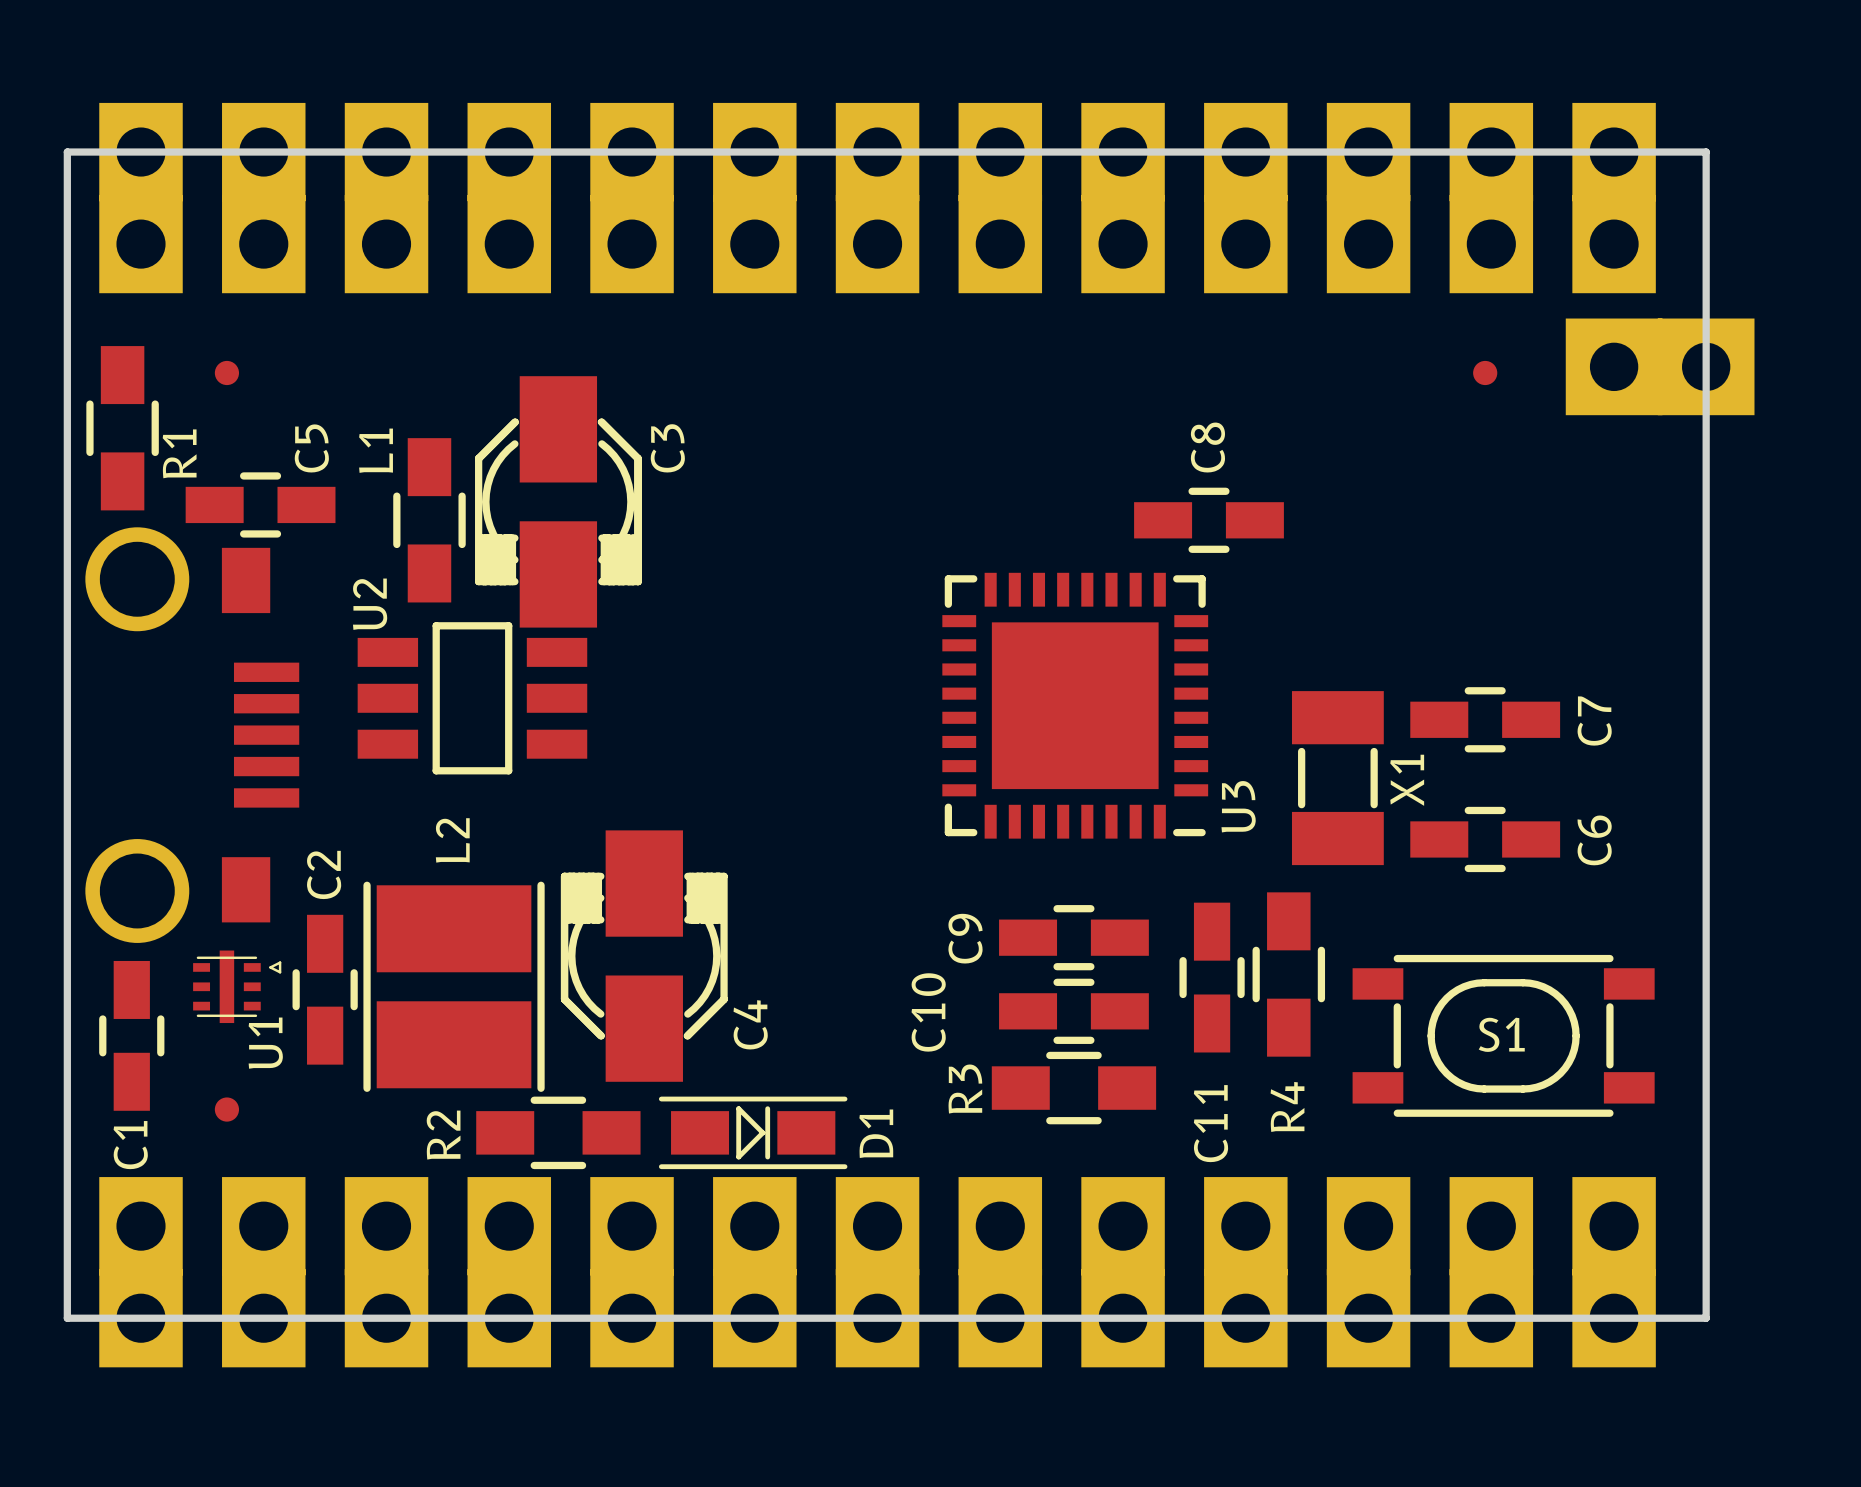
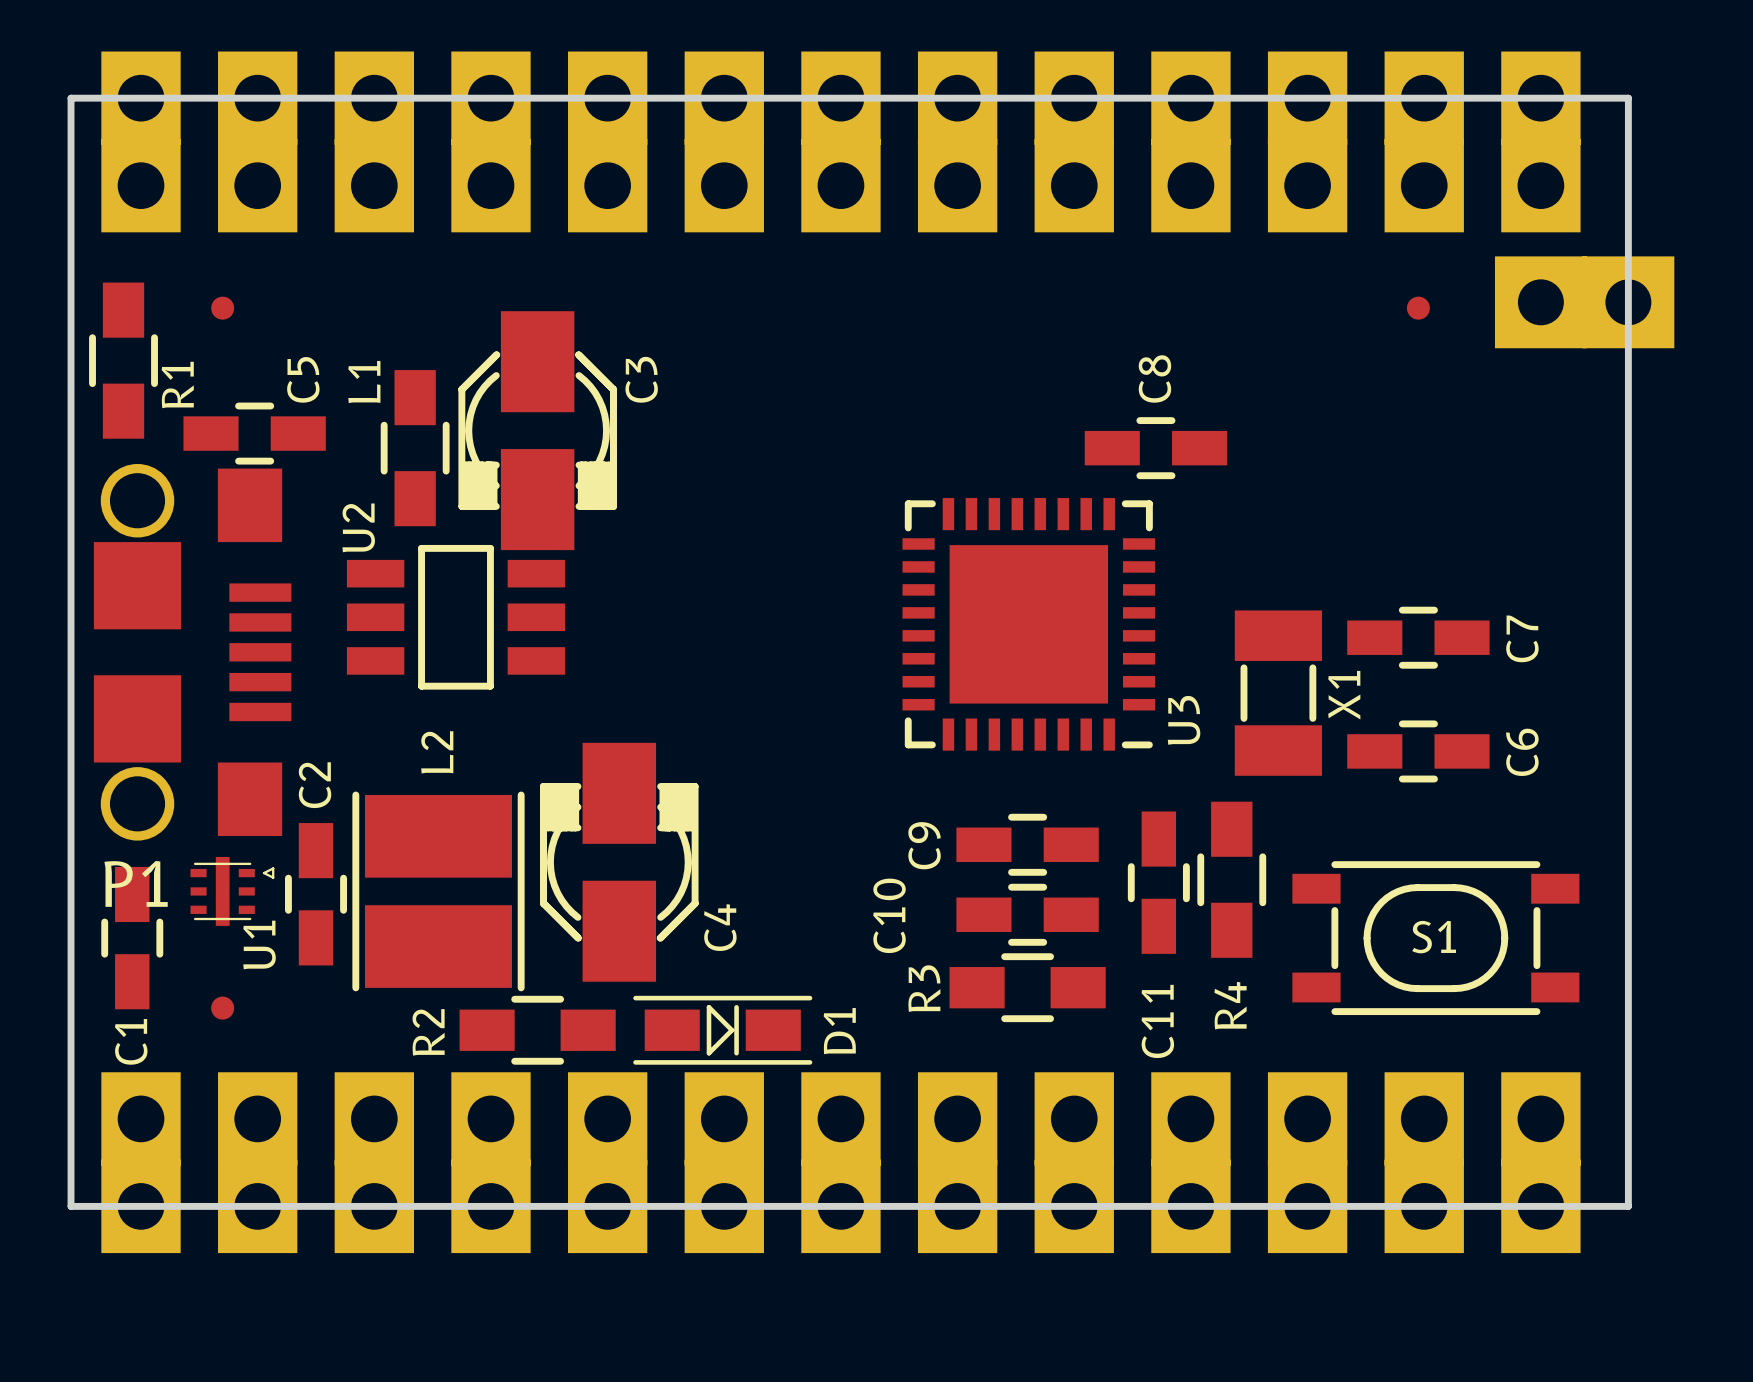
part: (192, 735) -> none
P1: none -> (192, 652)

